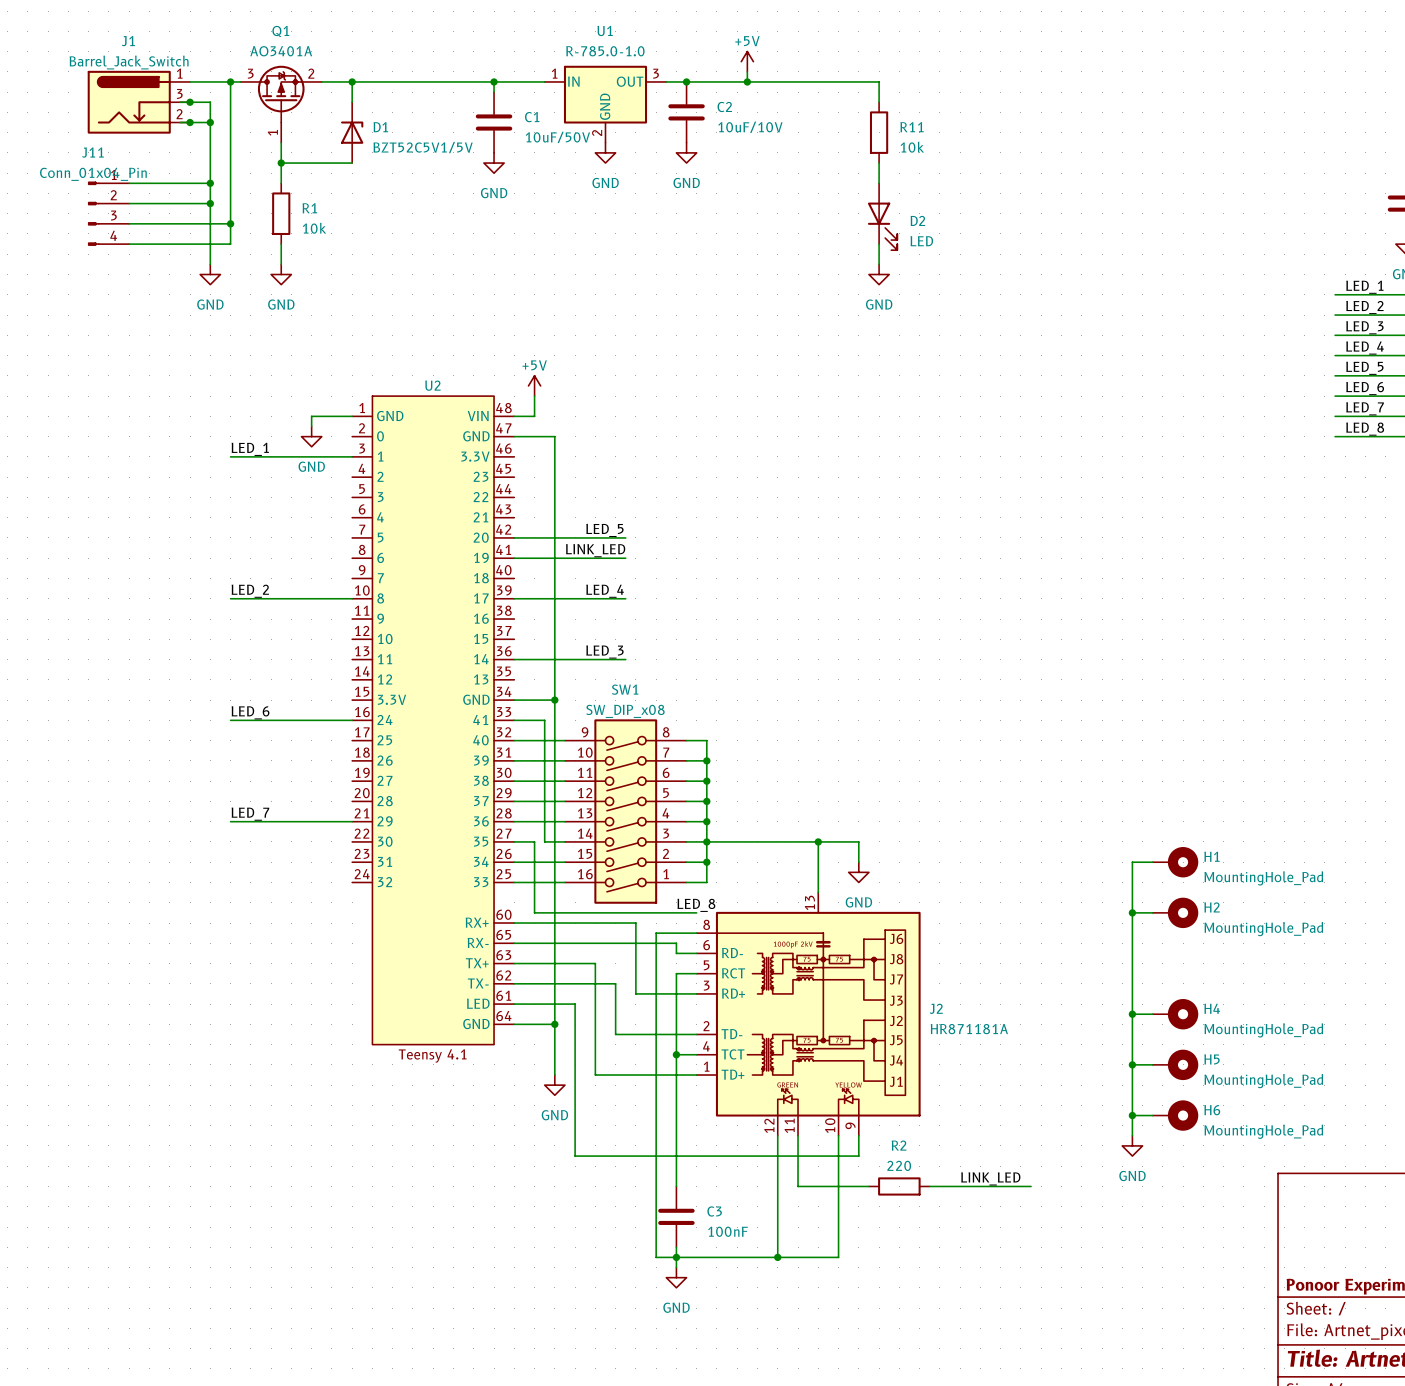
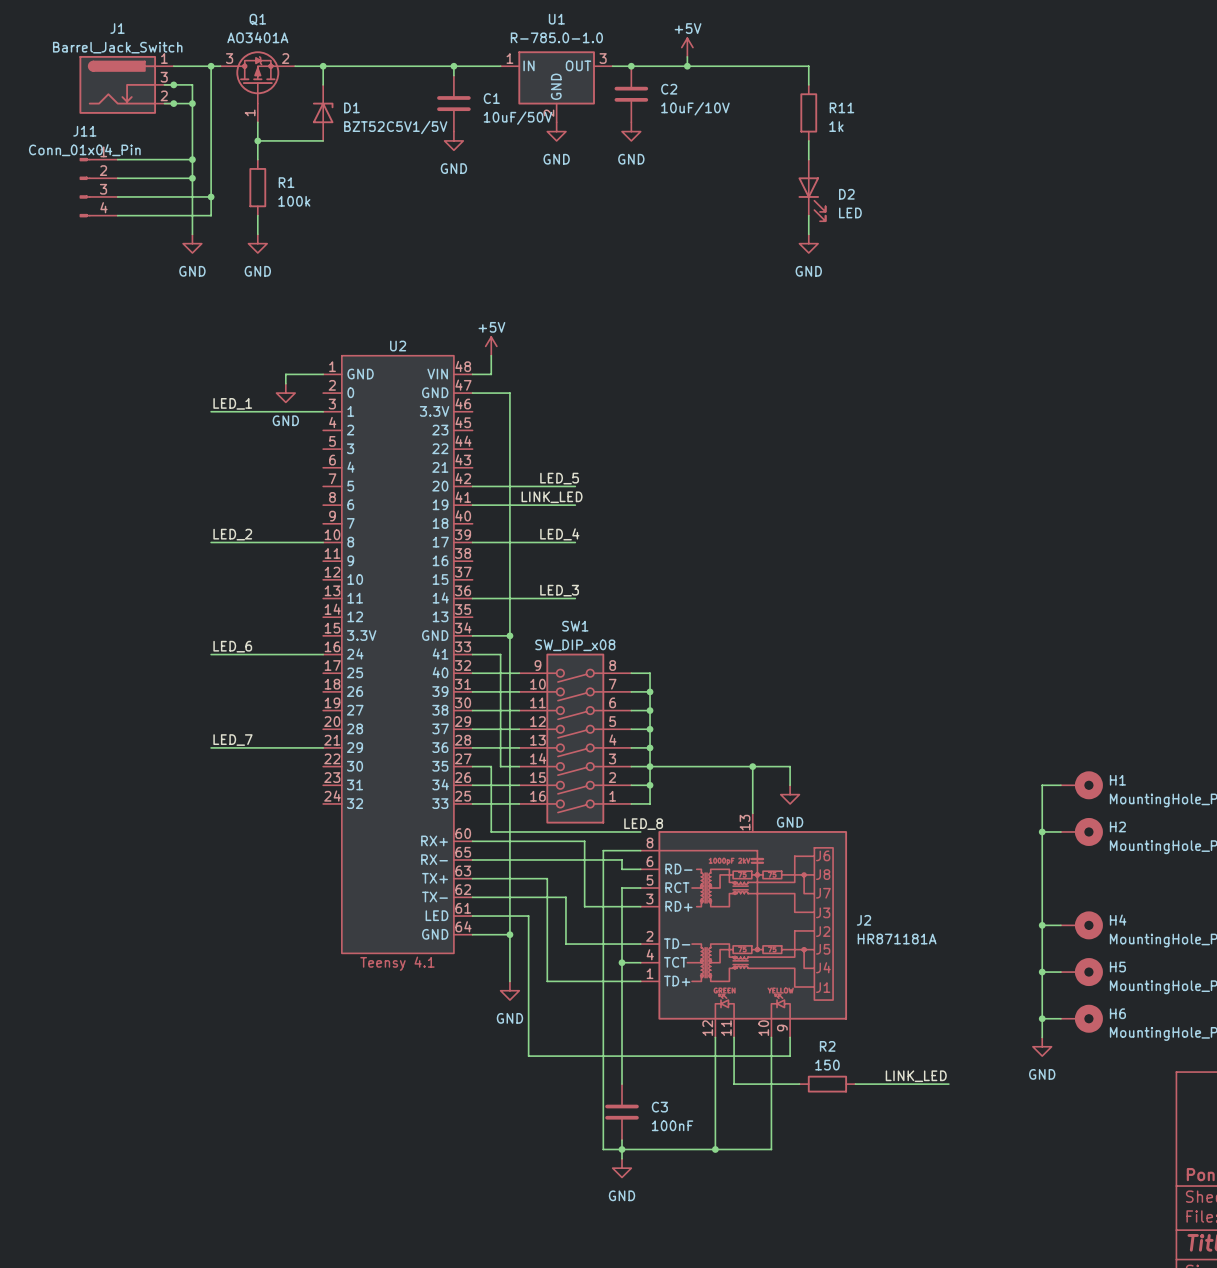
R11 value: 10k (912, 147) -> 1k (836, 126)
R1 value: 10k (314, 228) -> 100k (294, 201)
R2 value: 220 (899, 1165) -> 150 (827, 1065)

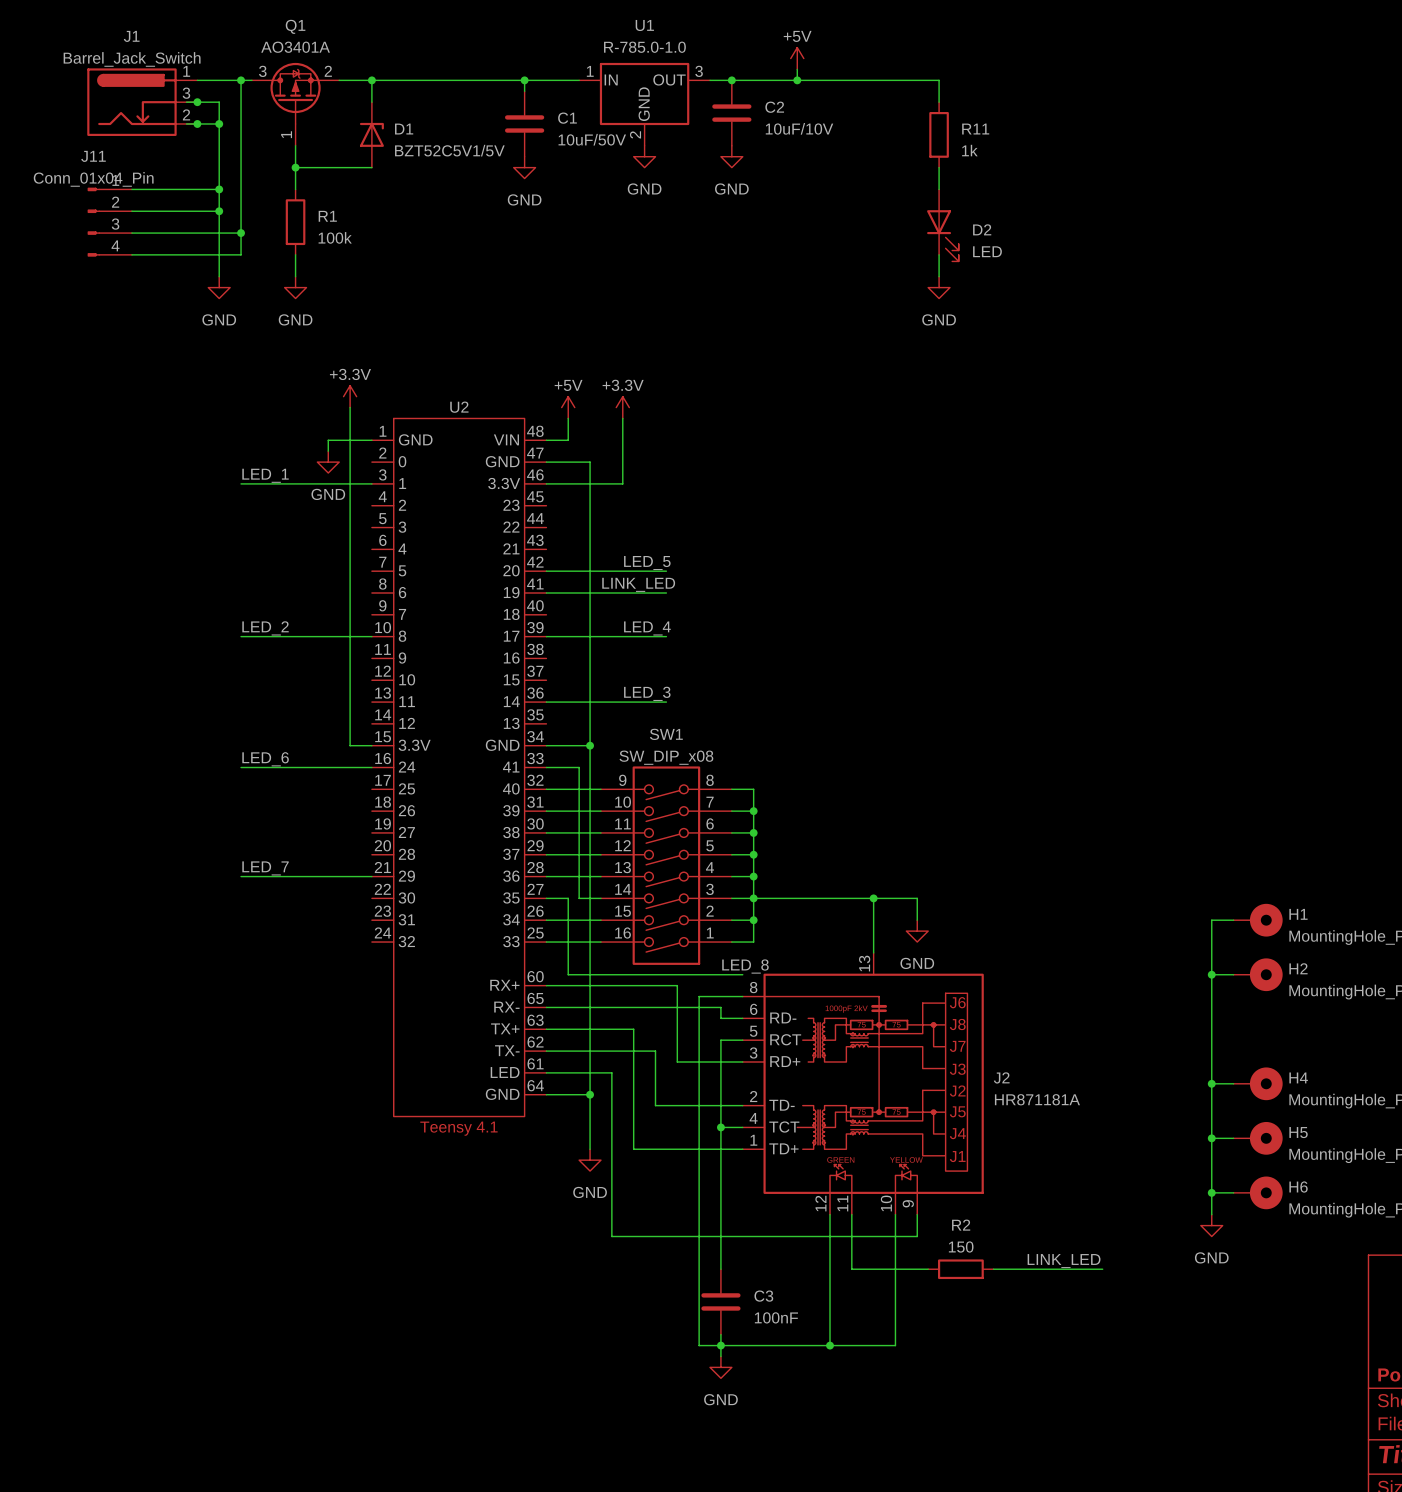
power symbol: none -> +3.3V (350, 396)
wire: none -> (350, 407) (350, 745) (371, 745)
power symbol: none -> +3.3V (622, 407)
wire: none -> (622, 418) (622, 483) (546, 483)

